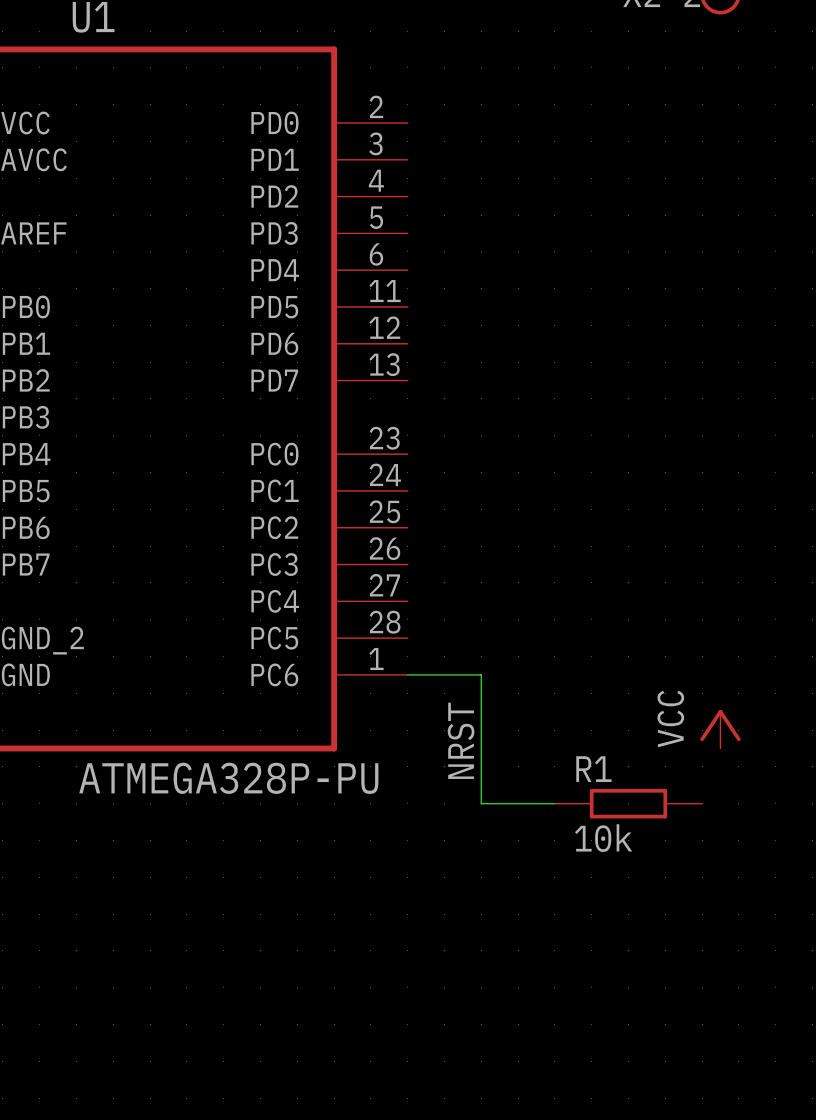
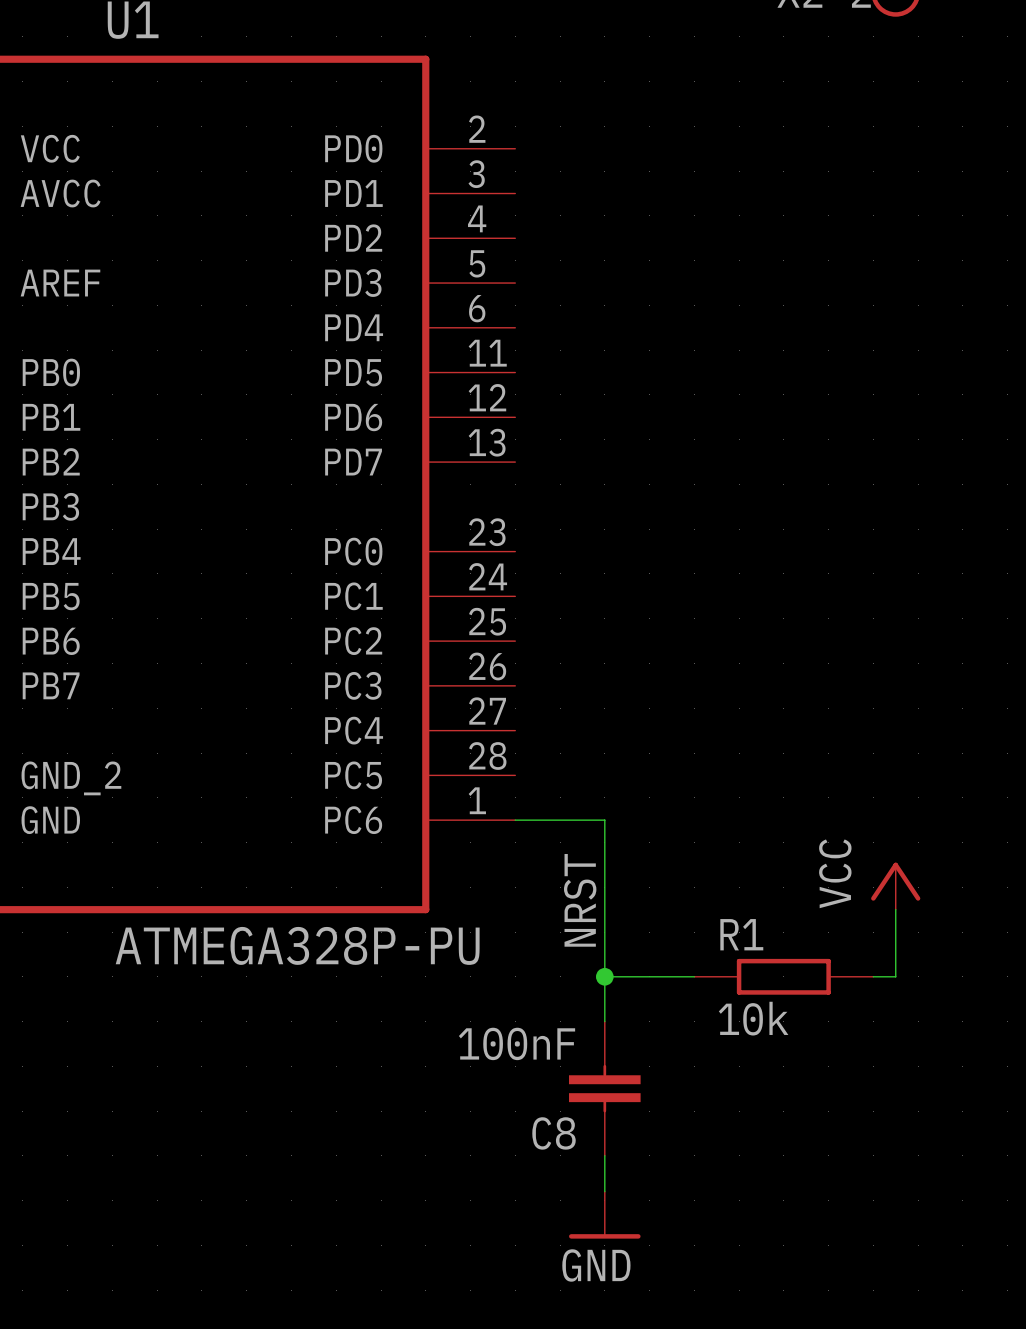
wire: none -> (895, 909) (895, 976) (873, 976)
wire: none -> (604, 976) (604, 1021)
junction: none -> (604, 976)
C8: none -> 100nF (604, 1088)
wire: none -> (604, 1155) (604, 1191)
power symbol: none -> GND (604, 1215)

